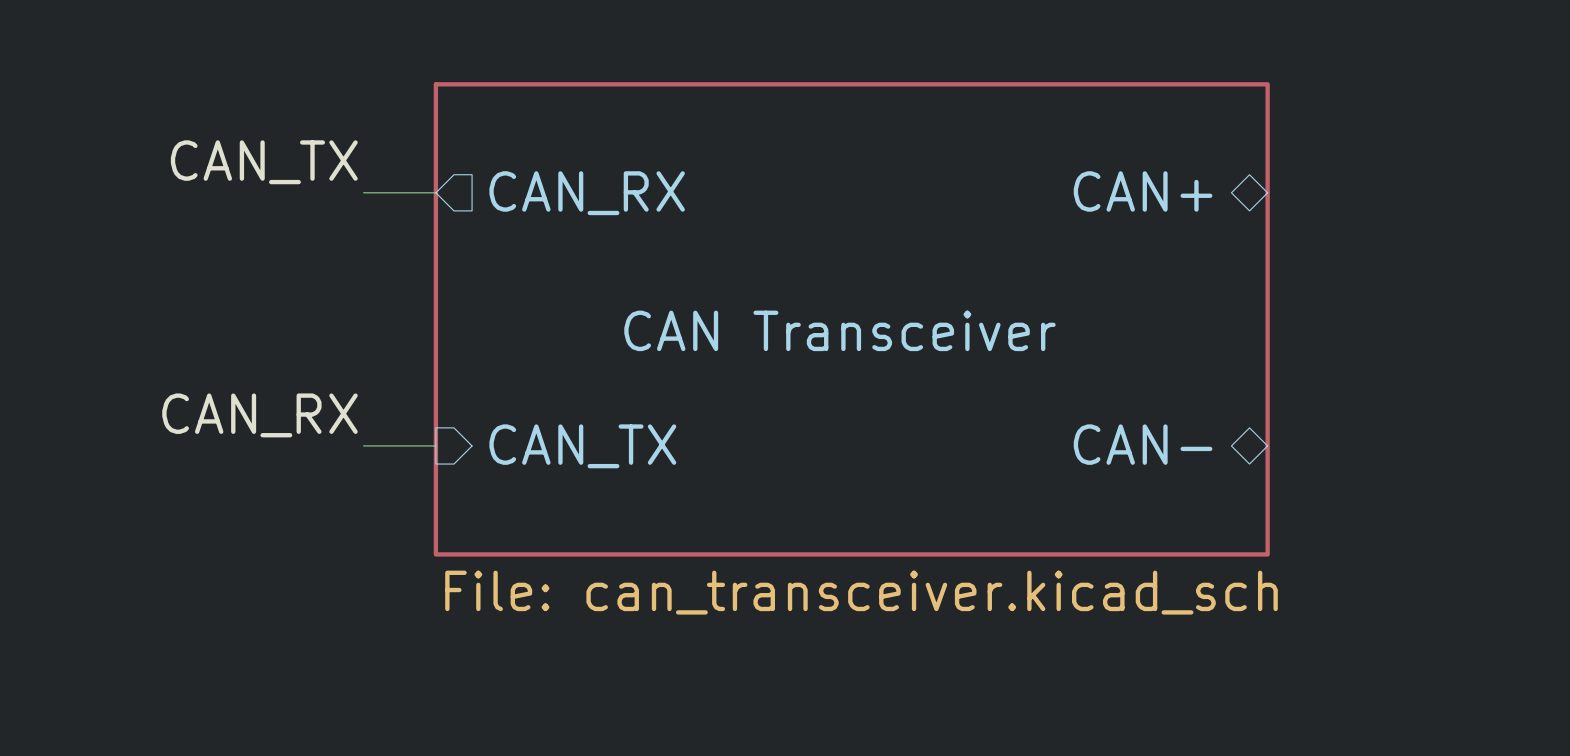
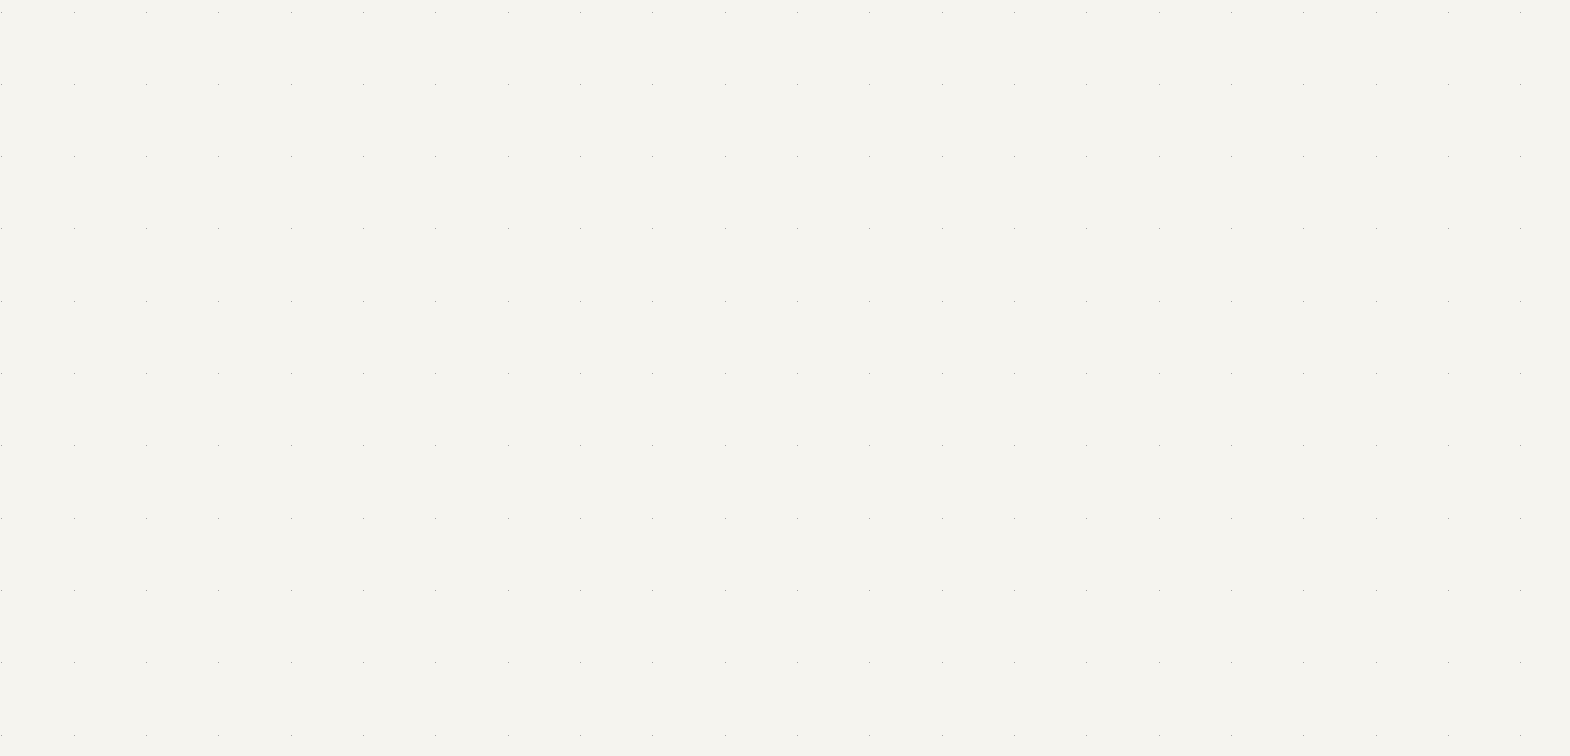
label: CAN_TX (264, 162) -> none
sheet pin: CAN+ (1143, 191) -> none
wire: (363, 192) (435, 192) -> none
sheet pin: CAN_RX (587, 193) -> none
sheet CAN Transceiver: File: can_transceiver.kicad_sch (851, 319) -> none
label: CAN_RX (259, 415) -> none
sheet pin: CAN- (1143, 444) -> none
wire: (363, 445) (435, 445) -> none
sheet pin: CAN_TX (582, 446) -> none

